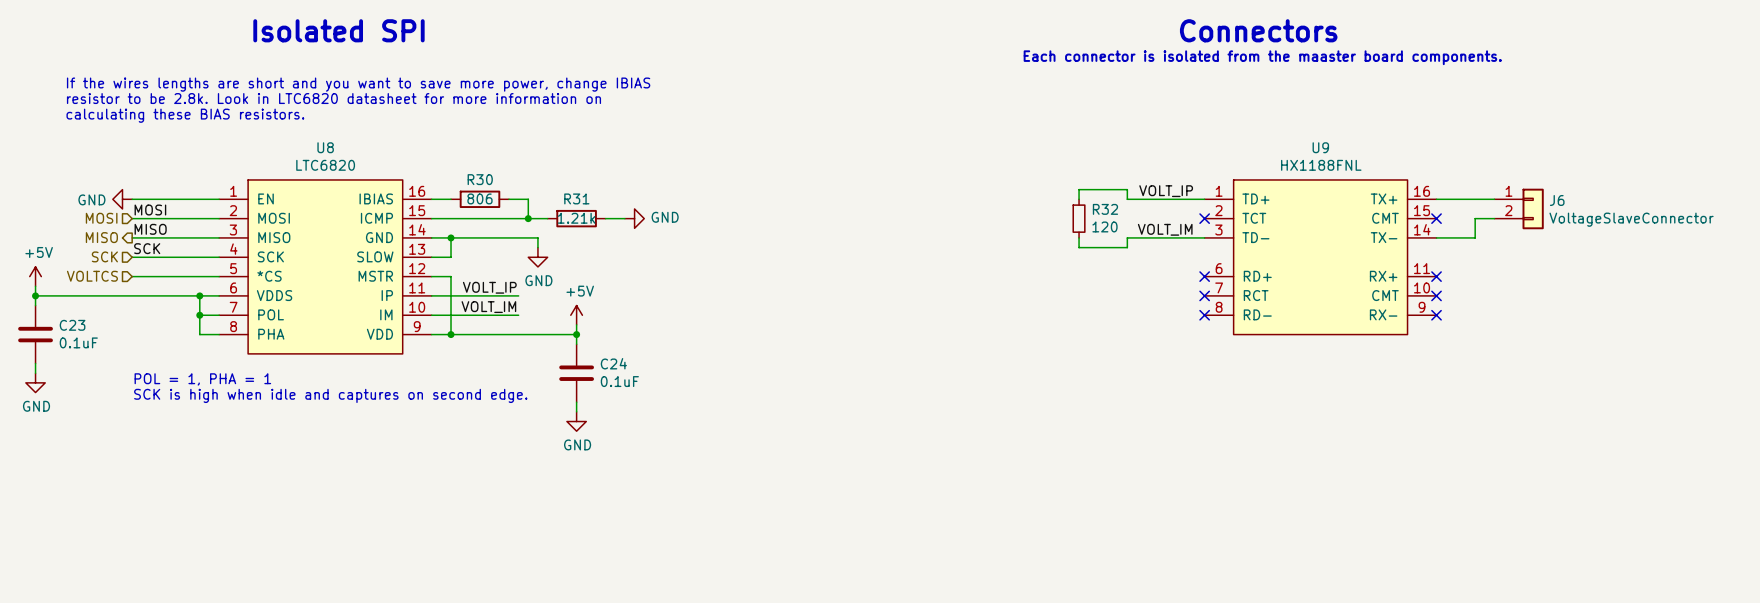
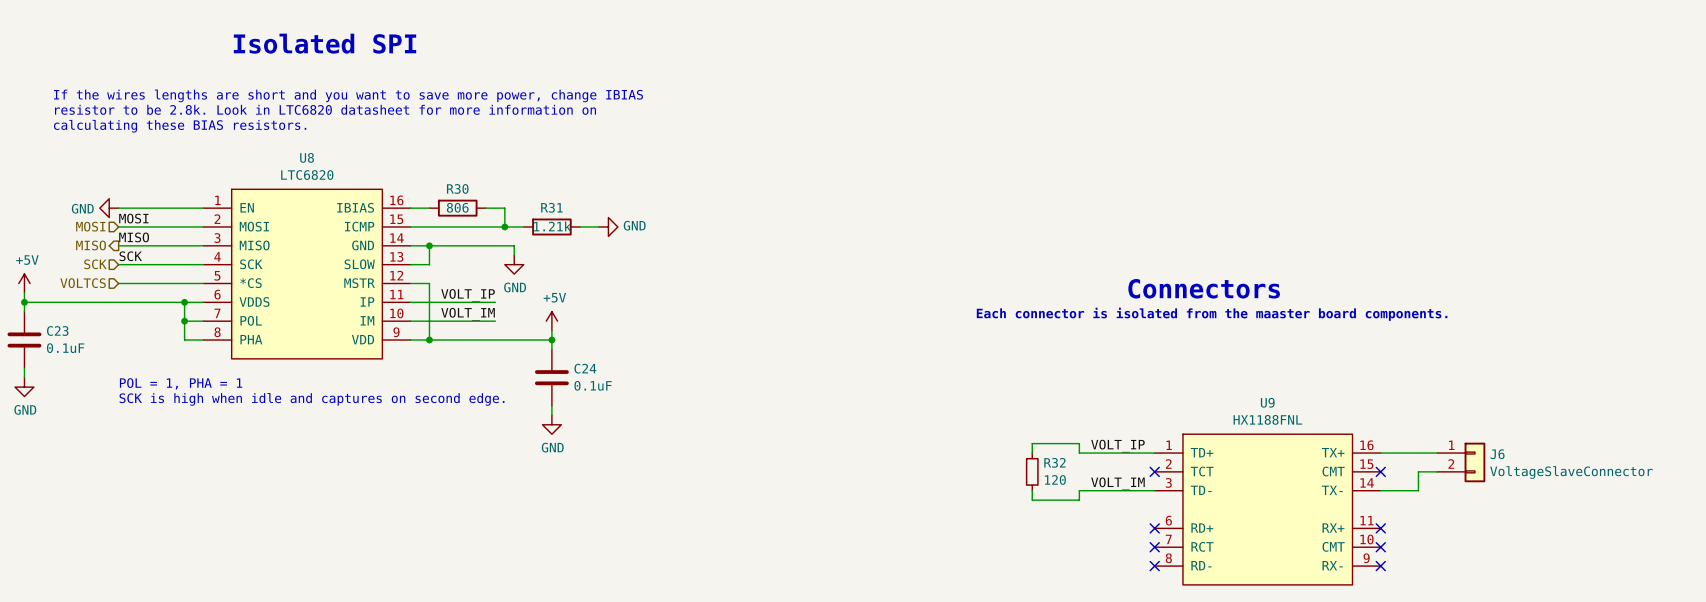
text: Connectors (1258, 30) -> none
text: Each connector is isolated from the maaster board components. (1262, 57) -> none
label: VOLT_IP (1166, 191) -> none
wire: (1079, 199) (1079, 189) (1127, 189) (1127, 199) (1204, 199) -> none
wire: (1436, 199) (1494, 199) -> none
J6 position: (1519, 208) -> (1461, 462)
R32 position: (1079, 218) -> (1032, 471)
no-connect mark: (1204, 218) -> none
no-connect mark: (1436, 218) -> none
wire: (1494, 218) (1475, 218) (1475, 237) (1436, 237) -> none
label: VOLT_IM (1165, 229) -> none
wire: (1079, 237) (1079, 247) (1127, 247) (1127, 237) (1204, 237) -> none
U9 position: (1320, 257) -> (1267, 509)
no-connect mark: (1204, 276) -> none
no-connect mark: (1436, 276) -> none
text: none -> Connectors (1204, 288)
no-connect mark: (1204, 295) -> none
no-connect mark: (1436, 295) -> none
text: none -> Each connector is isolated from the maaster board components. (1212, 314)
no-connect mark: (1204, 315) -> none
no-connect mark: (1436, 315) -> none
label: none -> VOLT_IP (1117, 446)
wire: none -> (1032, 453) (1032, 443) (1079, 443) (1079, 453) (1154, 453)
wire: none -> (1380, 453) (1437, 453)
no-connect mark: none -> (1154, 471)
no-connect mark: none -> (1380, 471)
wire: none -> (1437, 471) (1418, 471) (1418, 490) (1380, 490)
label: none -> VOLT_IM (1117, 483)
wire: none -> (1032, 490) (1032, 500) (1079, 500) (1079, 490) (1154, 490)
no-connect mark: none -> (1154, 528)
no-connect mark: none -> (1380, 528)
no-connect mark: none -> (1154, 547)
no-connect mark: none -> (1380, 547)
no-connect mark: none -> (1154, 566)
no-connect mark: none -> (1380, 566)

